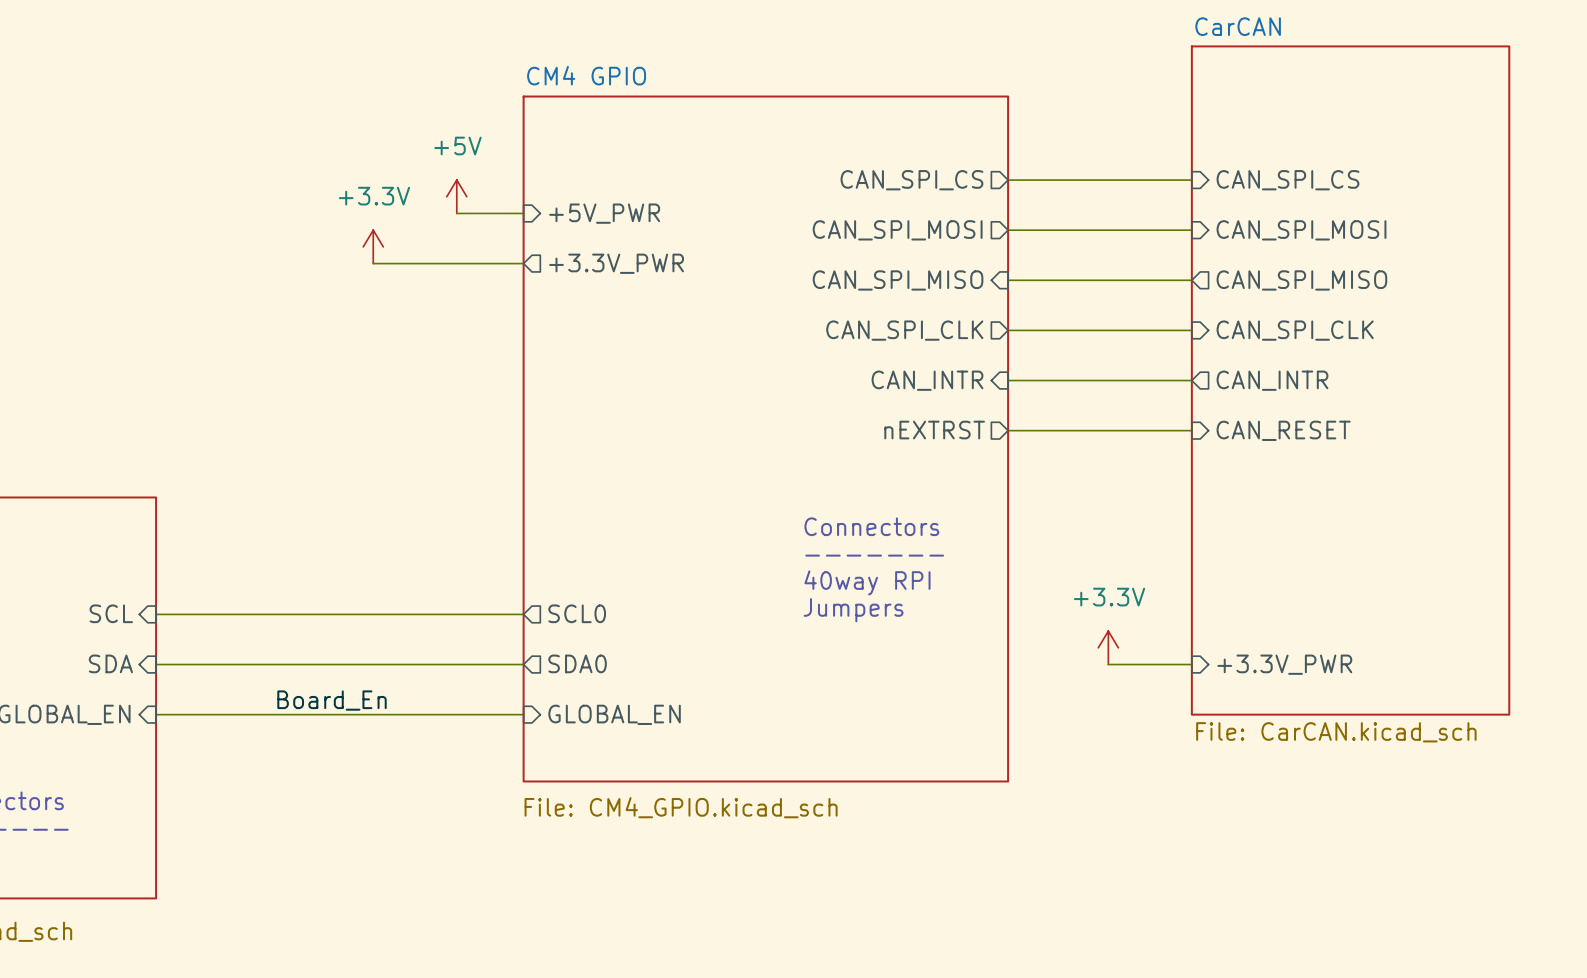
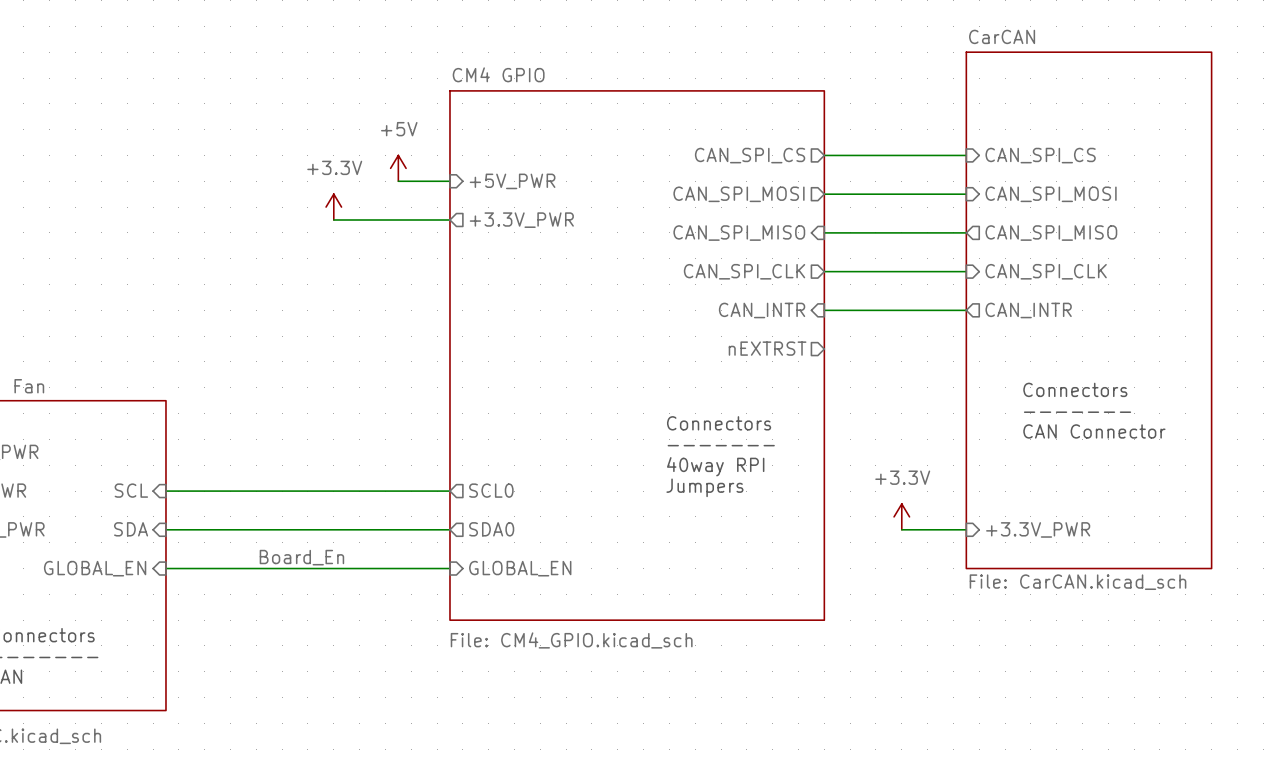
wire: (1008, 430) (1191, 430) -> none
sheet pin: CAN_RESET (1283, 430) -> none
text: none -> Connectors (1075, 389)
text: none -> ------- (1077, 412)
text: none -> CAN Connector (1094, 431)

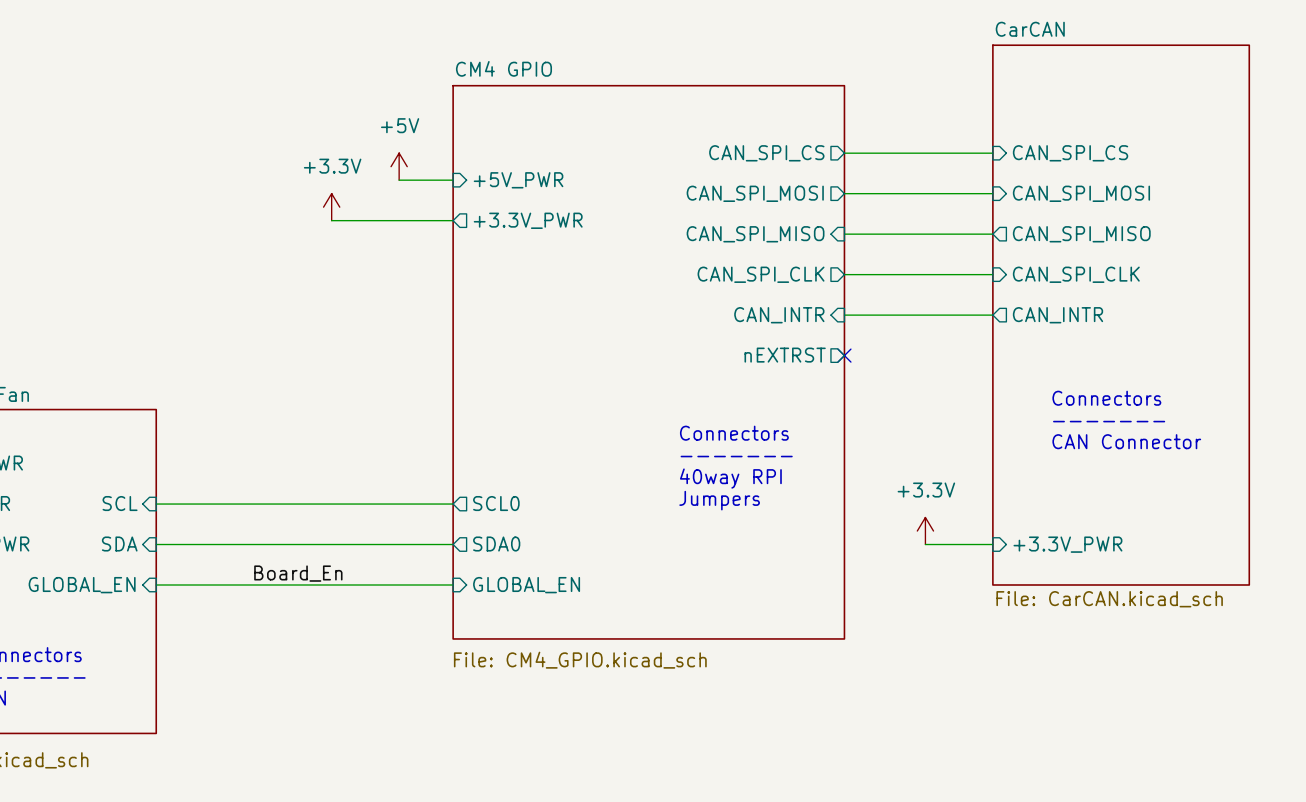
no-connect mark: none -> (844, 355)

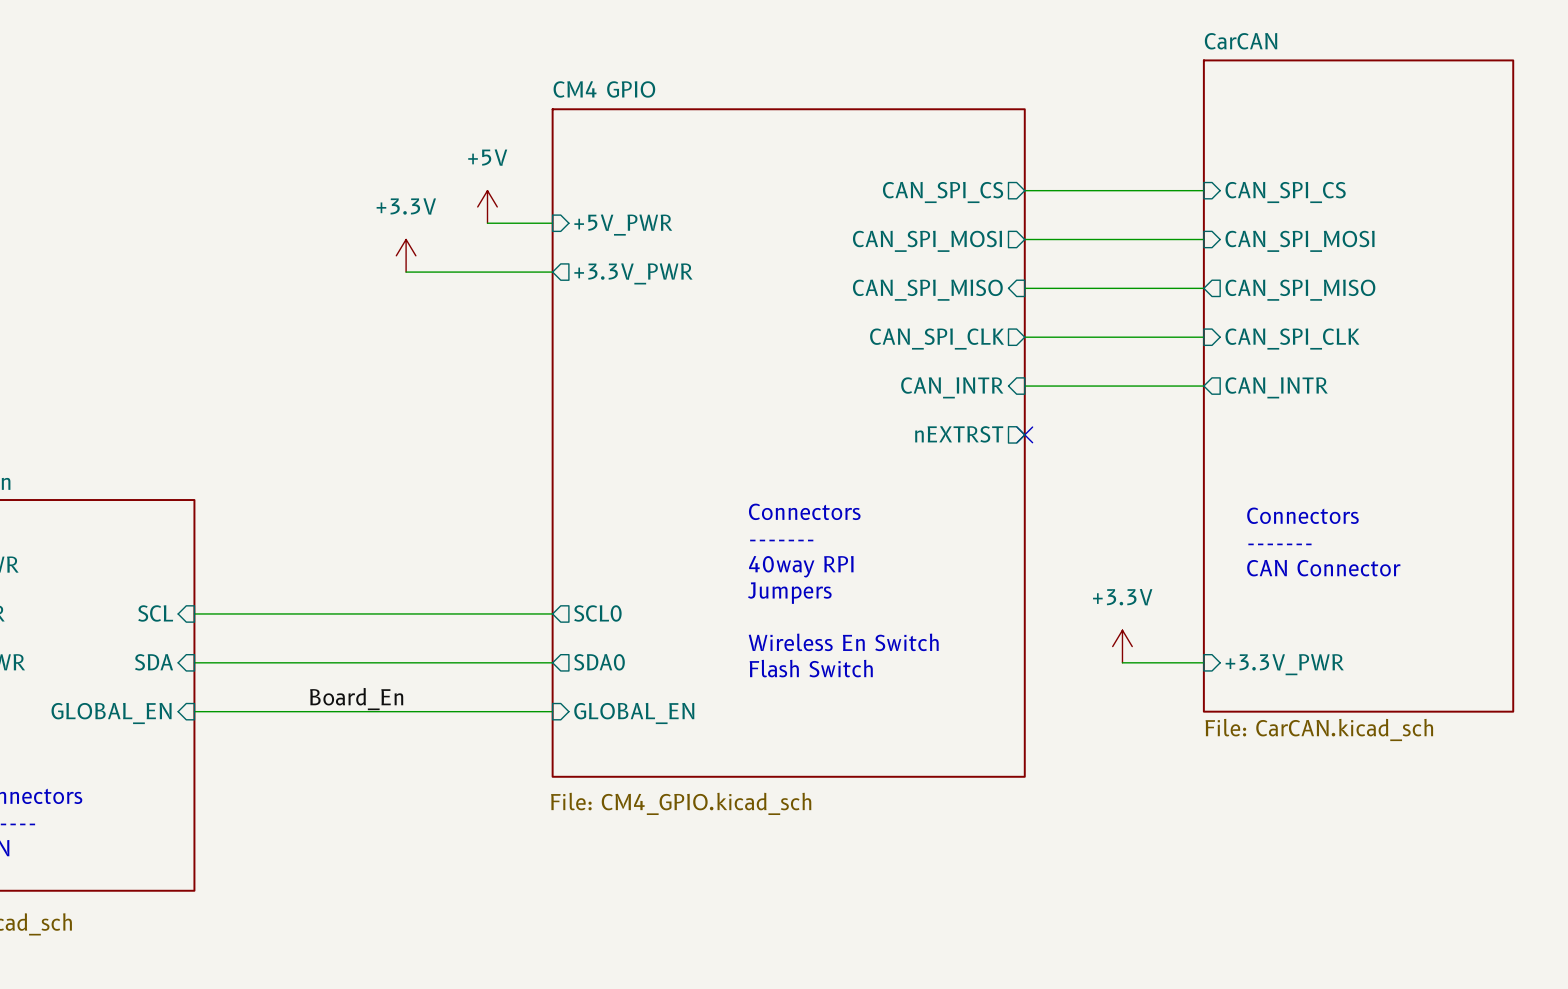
text position: Connectors (1106, 398) -> Connectors (1302, 515)
text position: ------- (1109, 421) -> ------- (1279, 544)
text position: Connectors (734, 433) -> Connectors (804, 511)
text position: CAN Connector (1126, 441) -> CAN Connector (1323, 568)
text position: ------- (736, 456) -> ------- (781, 540)
text position: 40way RPI (730, 478) -> 40way RPI (801, 566)
text position: Jumpers (719, 500) -> Jumpers (789, 593)
text: none -> Wireless En Switch (843, 642)
text: none -> Flash Switch (811, 668)

